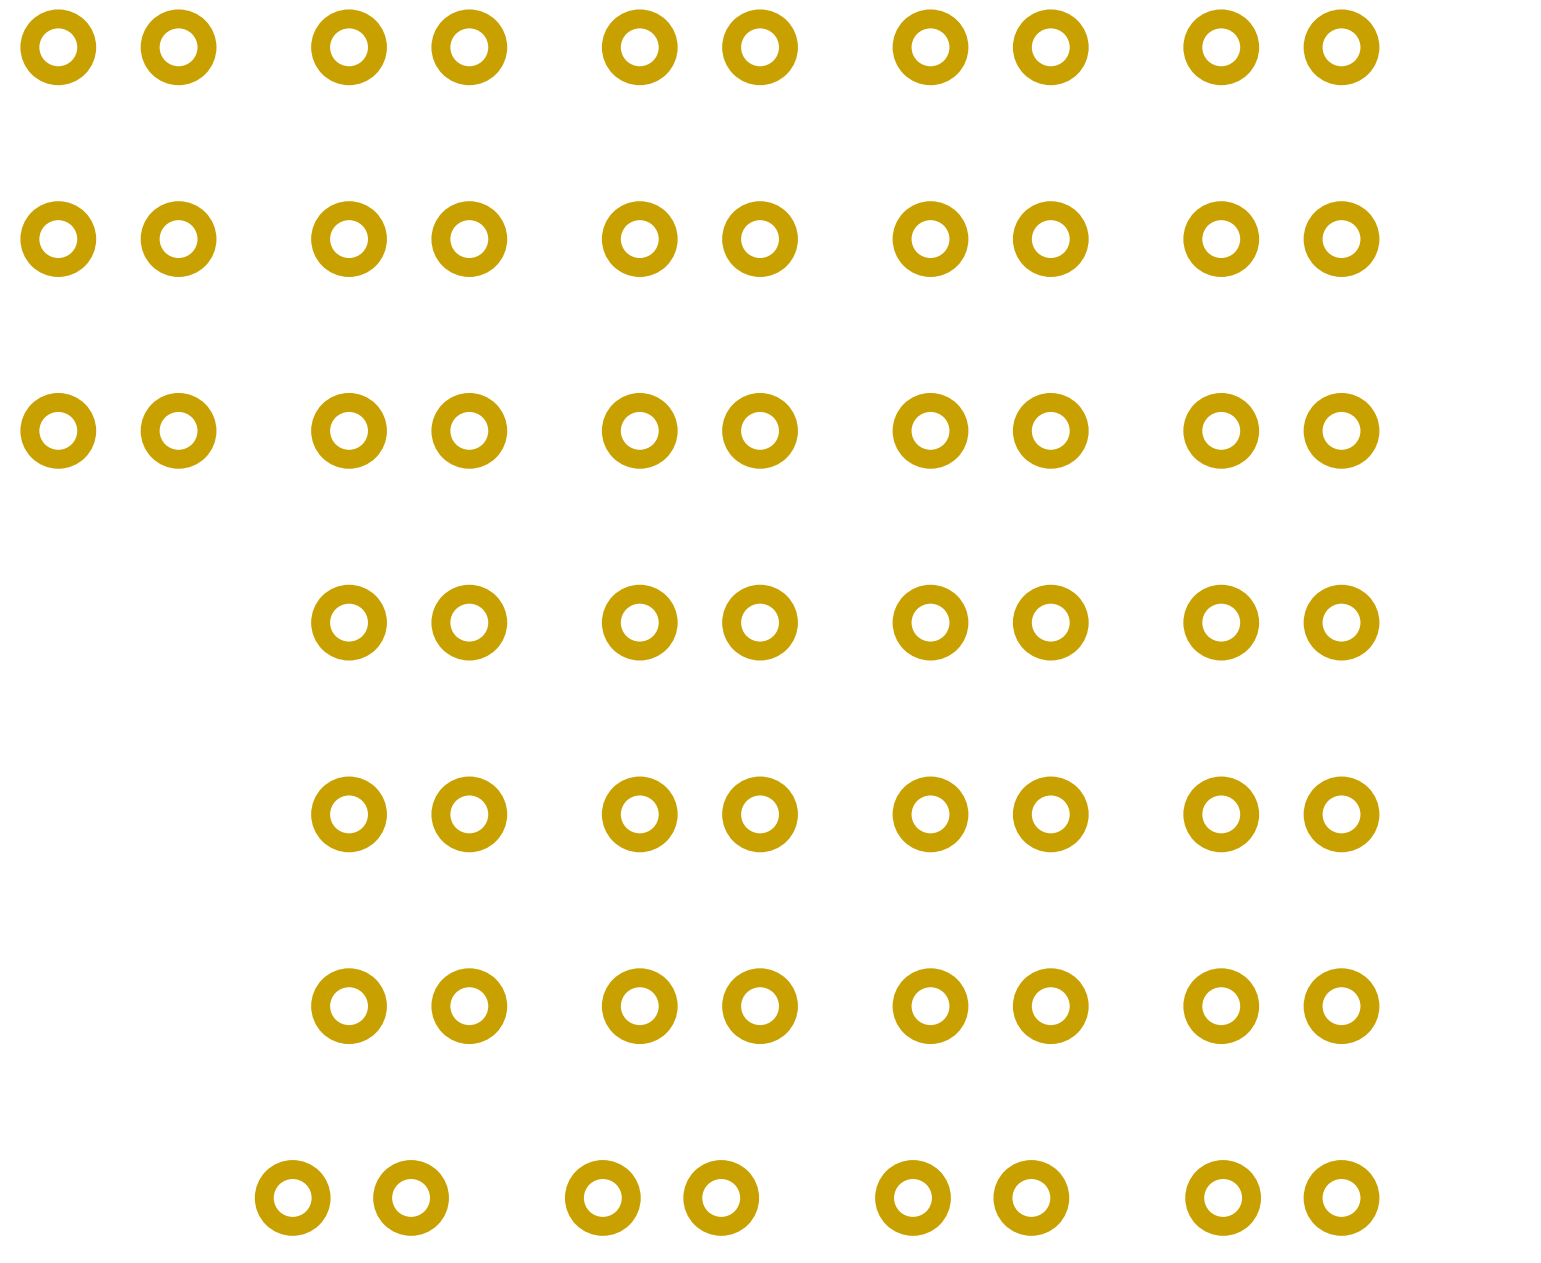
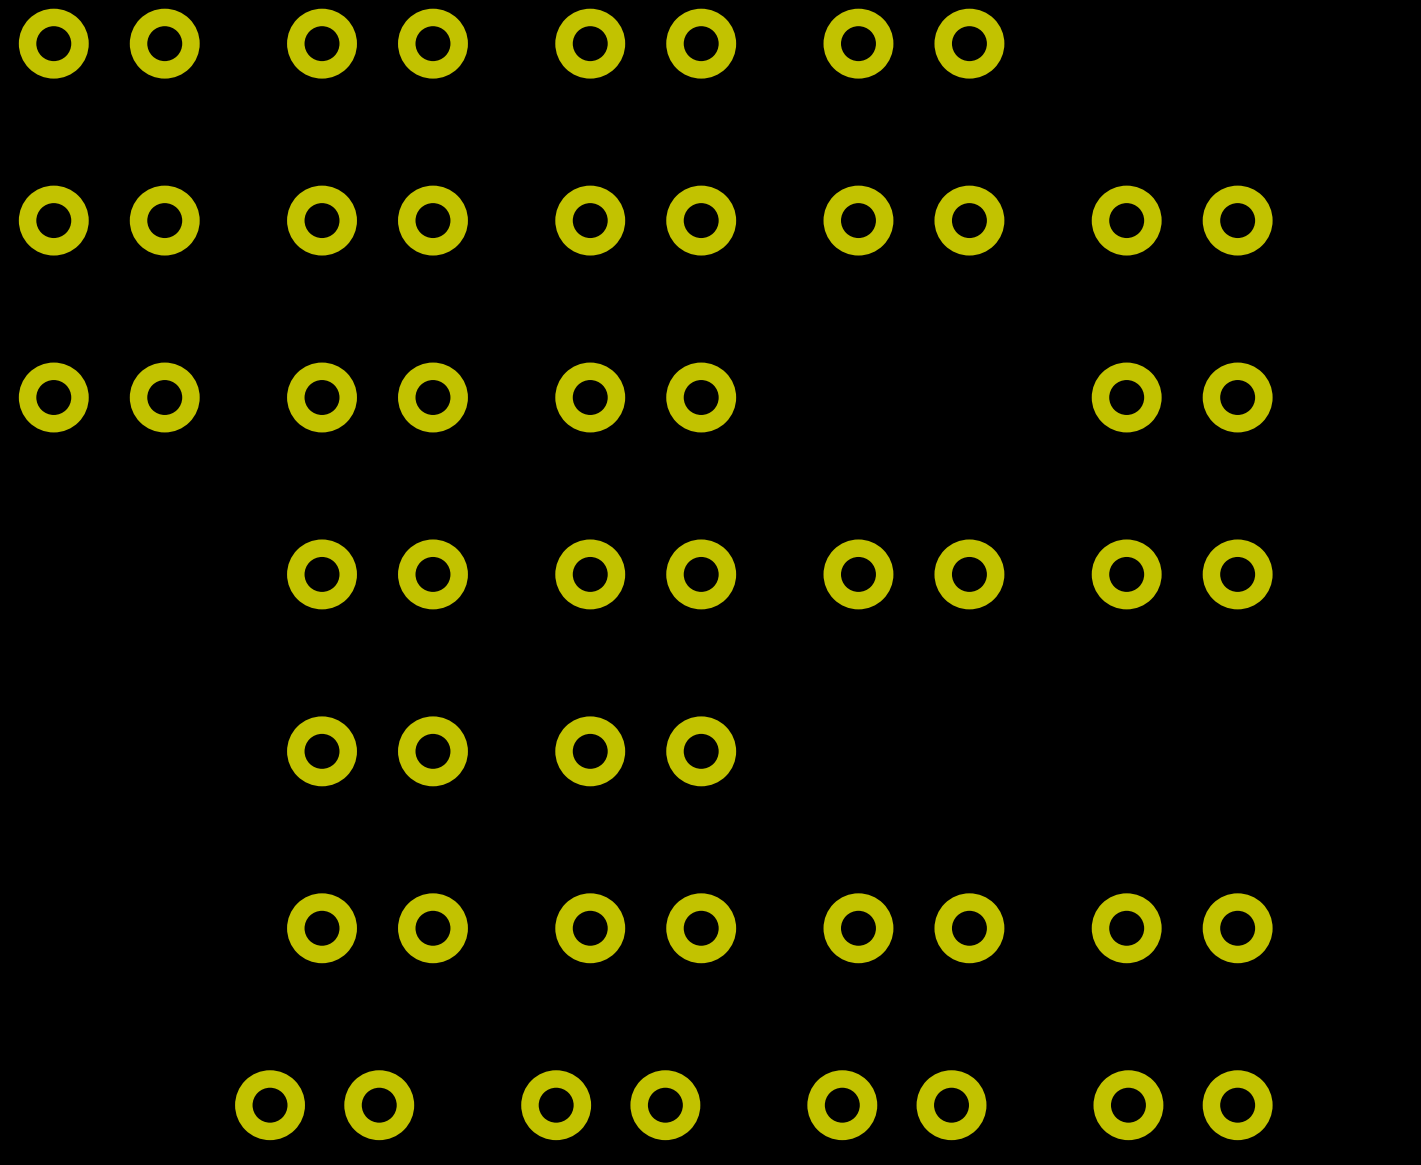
part: (1281, 47) -> none
part: (990, 430) -> none
part: (990, 814) -> none
part: (1281, 814) -> none

